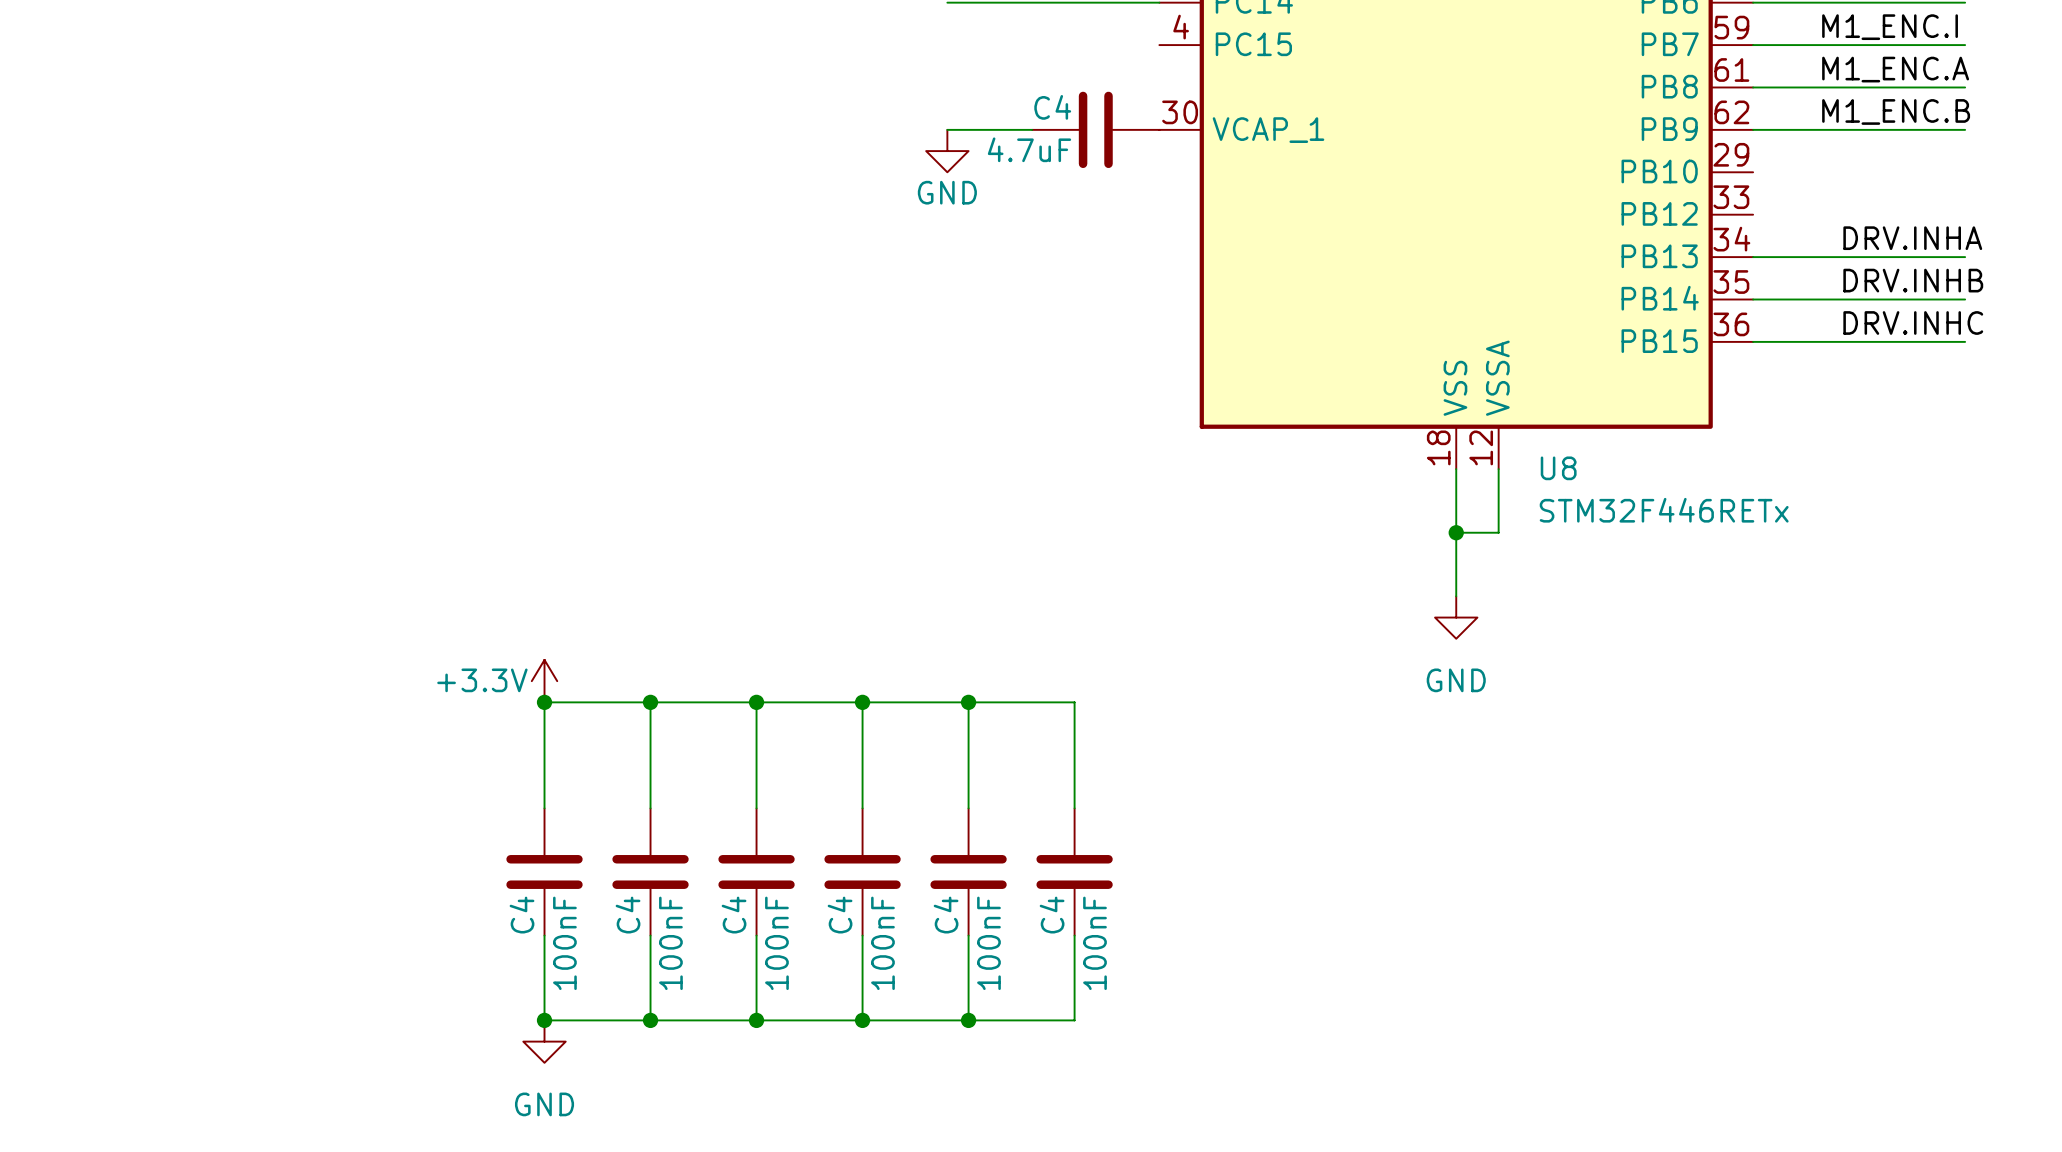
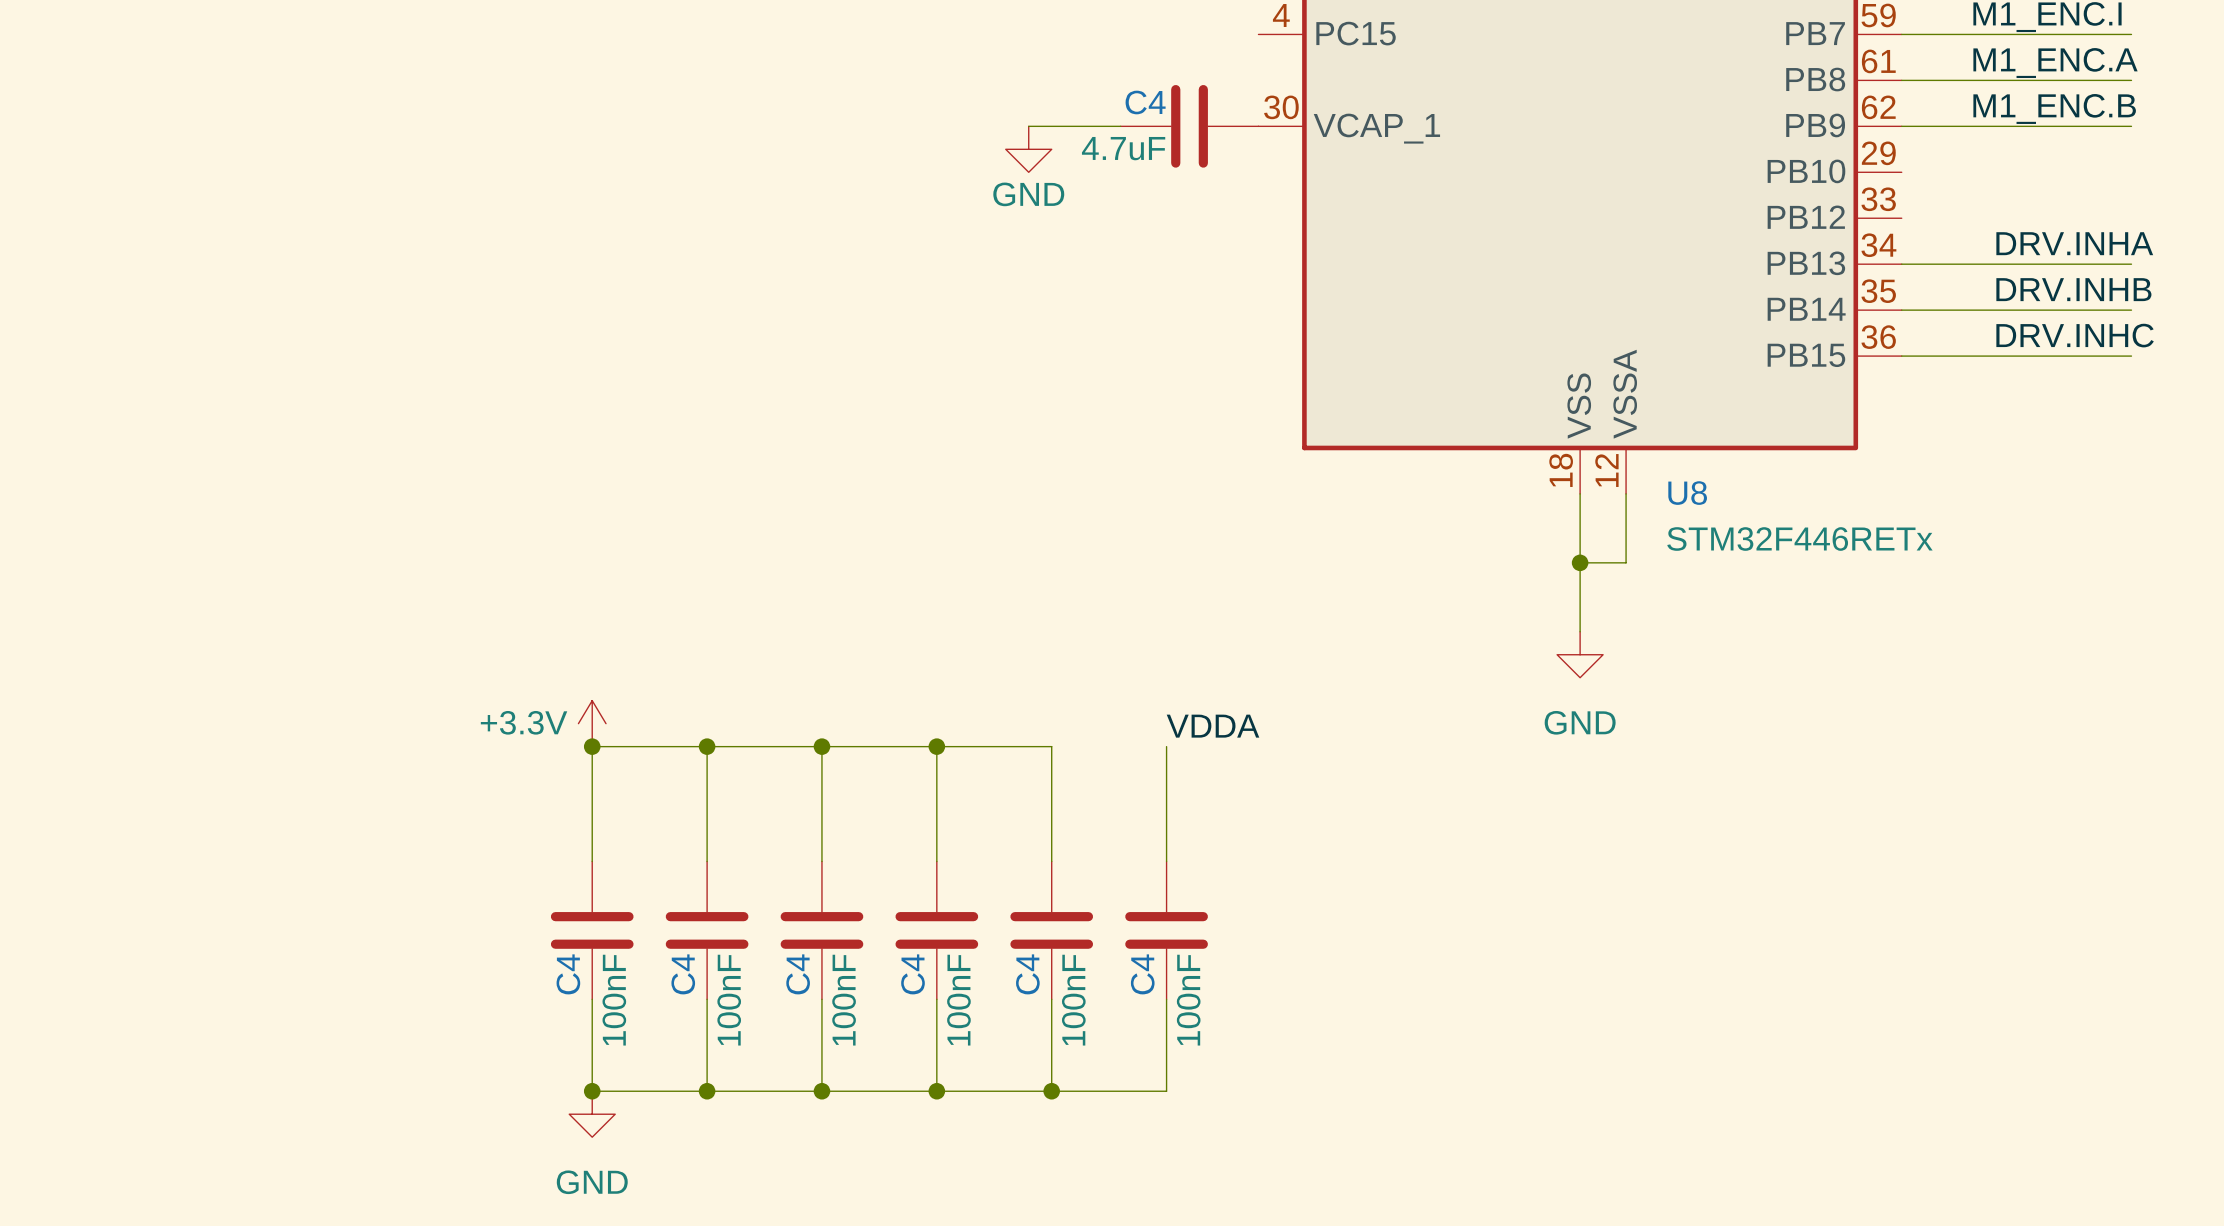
label: none -> VDDA (1213, 726)
wire: (968, 702) (1074, 702) -> none
junction: (968, 702) -> none

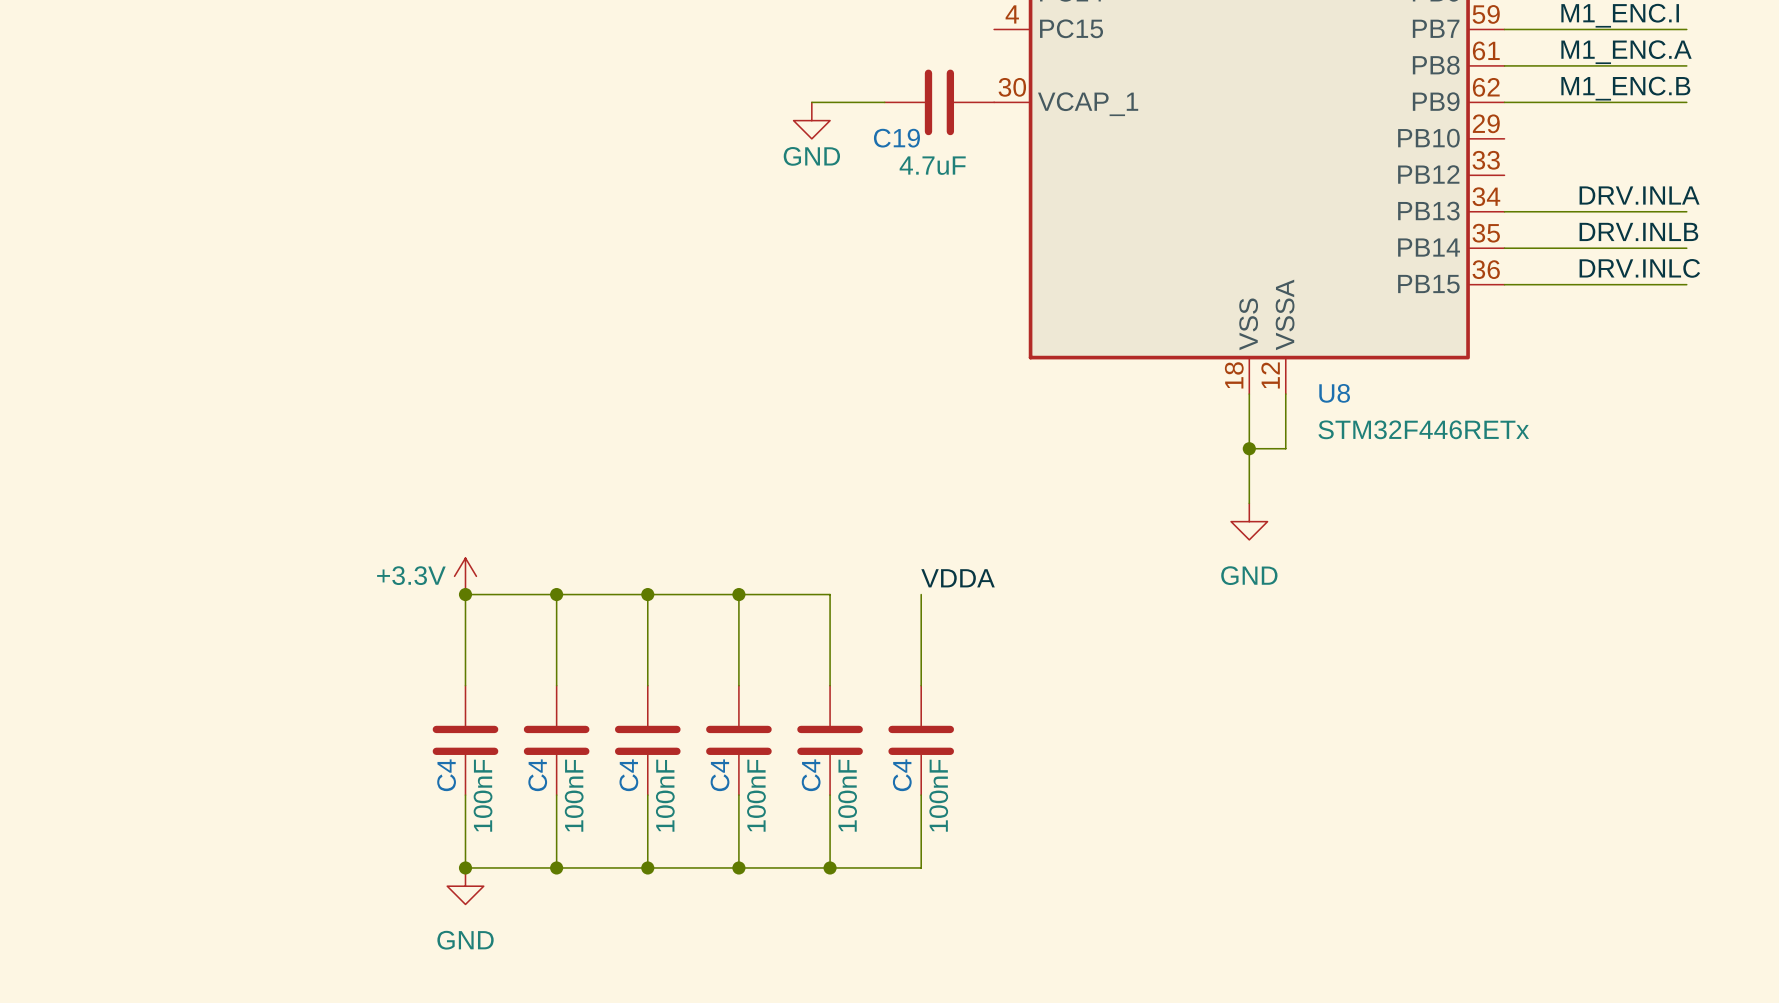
C4 name: C4 (1145, 102) -> C19 (896, 138)
C4 value position: 4.7uF (1123, 148) -> 4.7uF (932, 165)
label: DRV.INHA (2074, 243) -> DRV.INLA (1639, 195)
label: DRV.INHB (2073, 289) -> DRV.INLB (1638, 231)
label: DRV.INHC (2075, 335) -> DRV.INLC (1639, 268)

